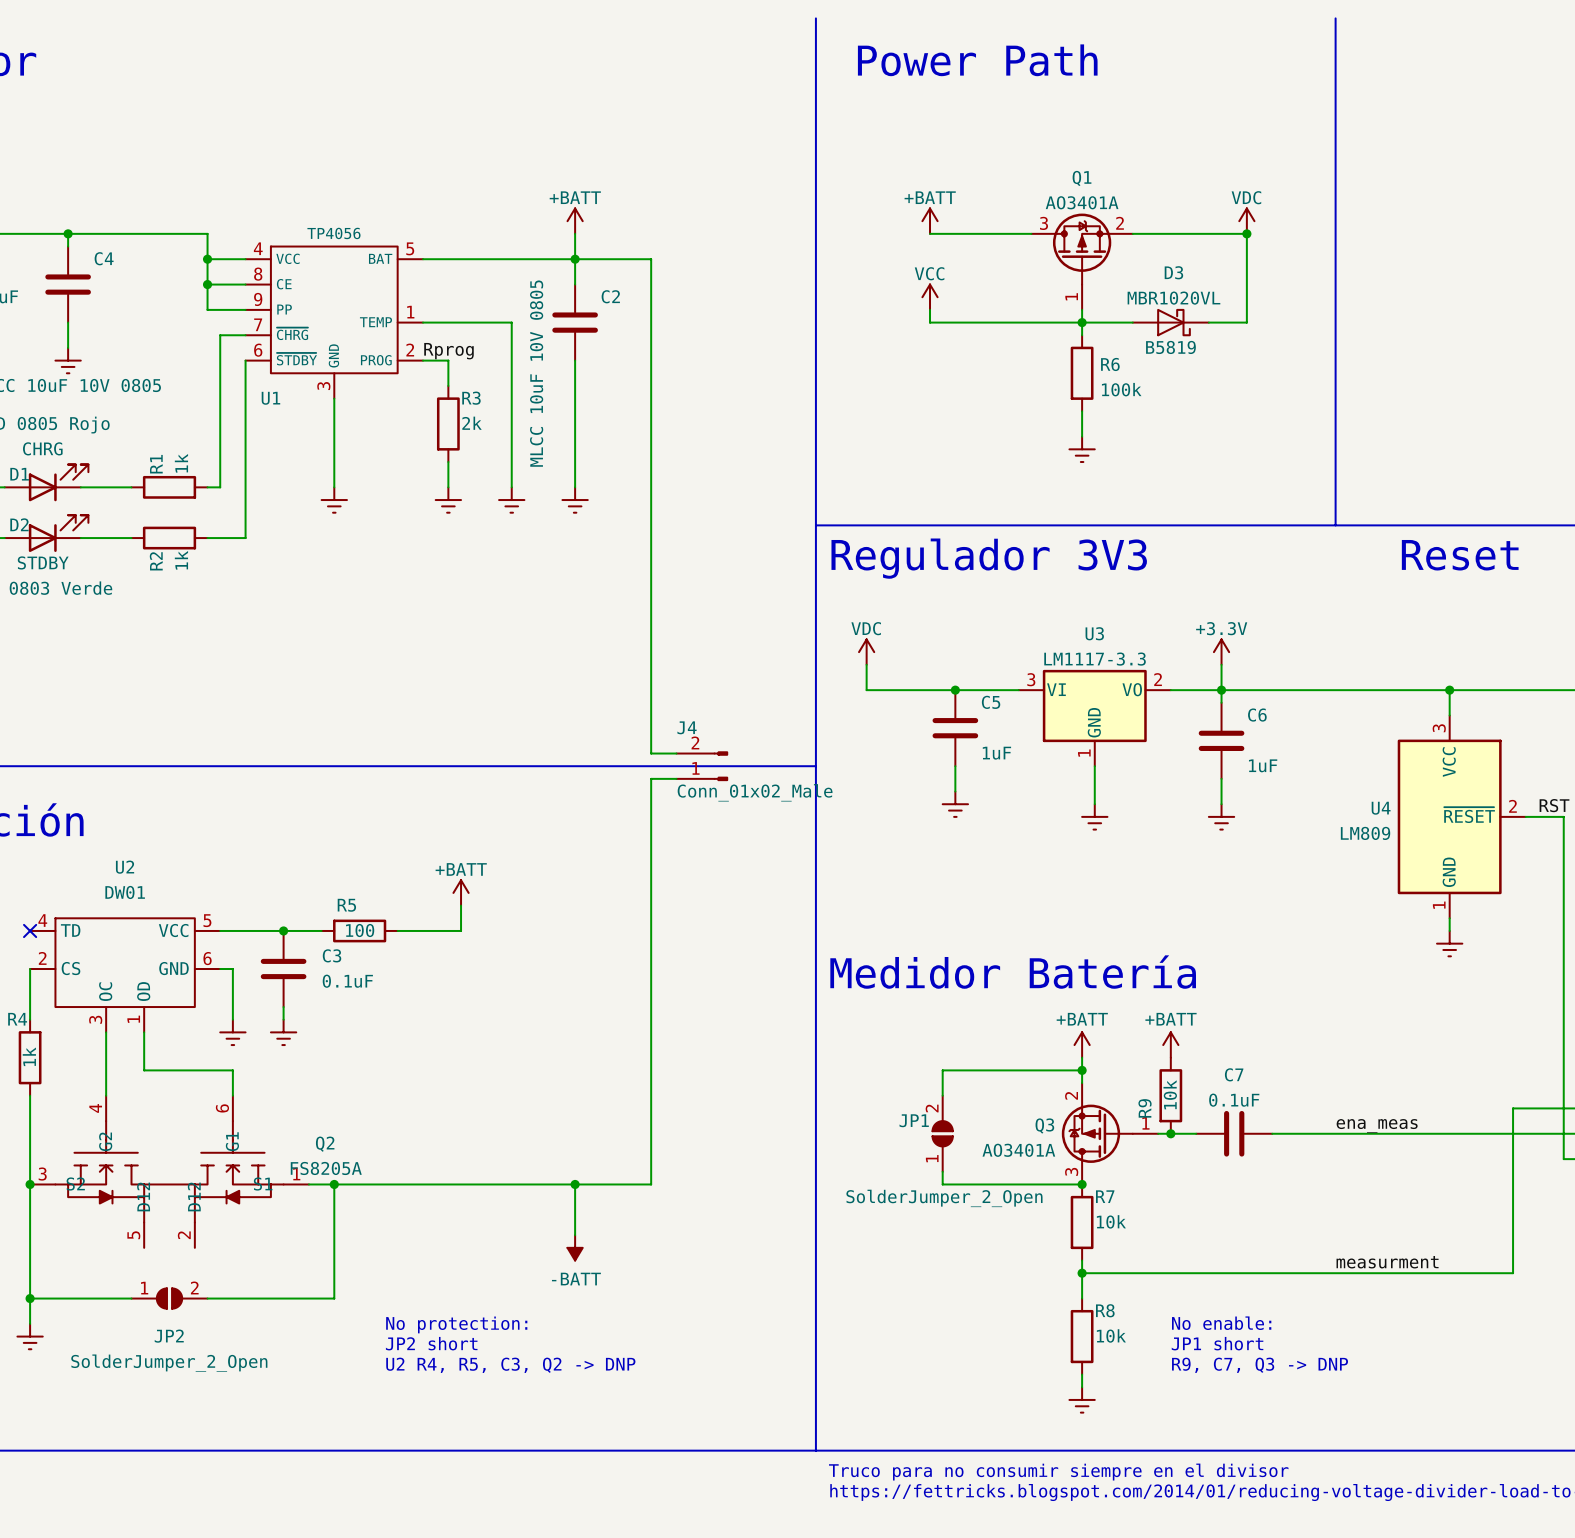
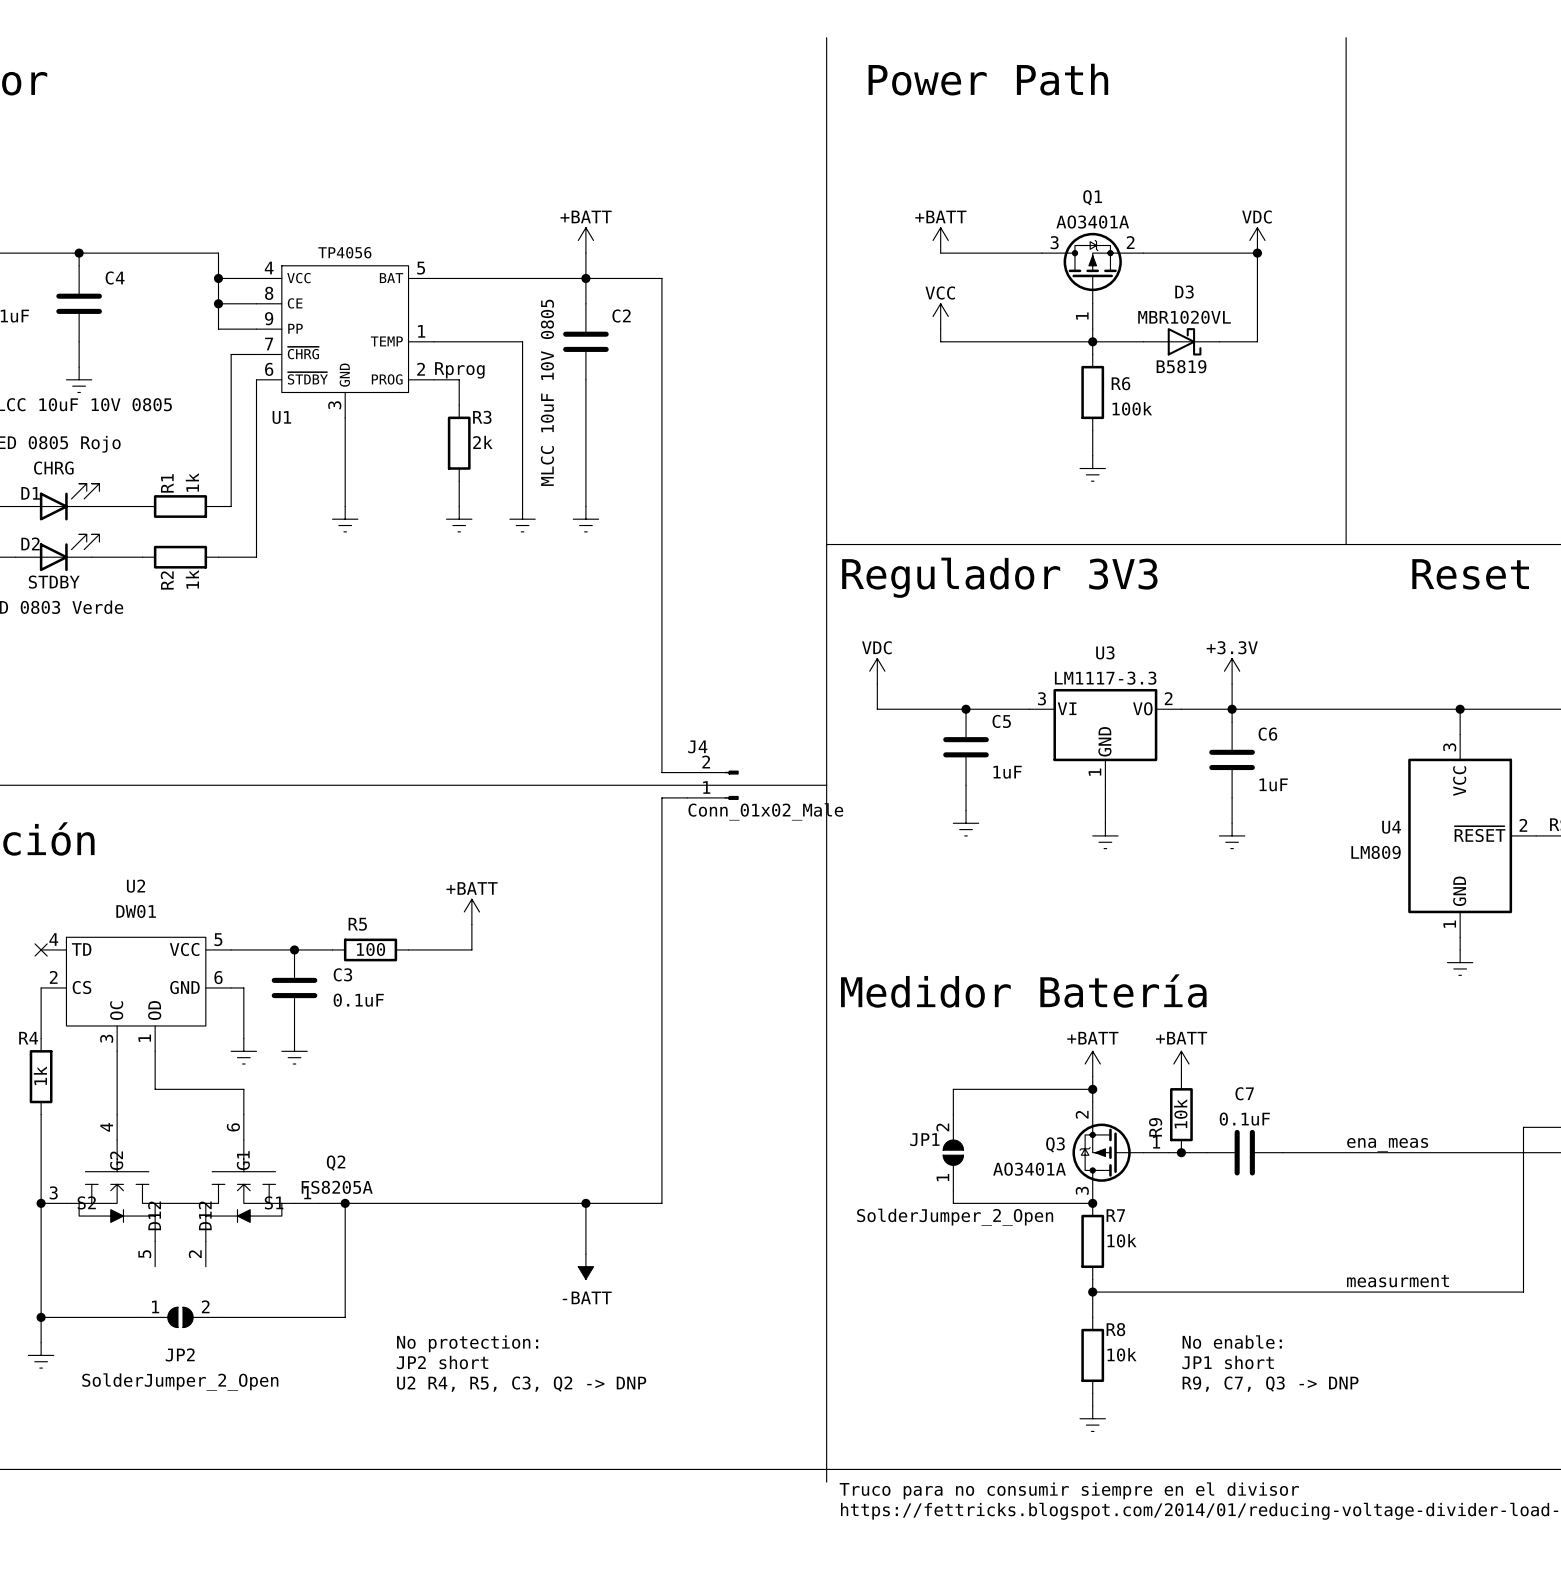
line: none -> (826, 1469) (826, 1482)

